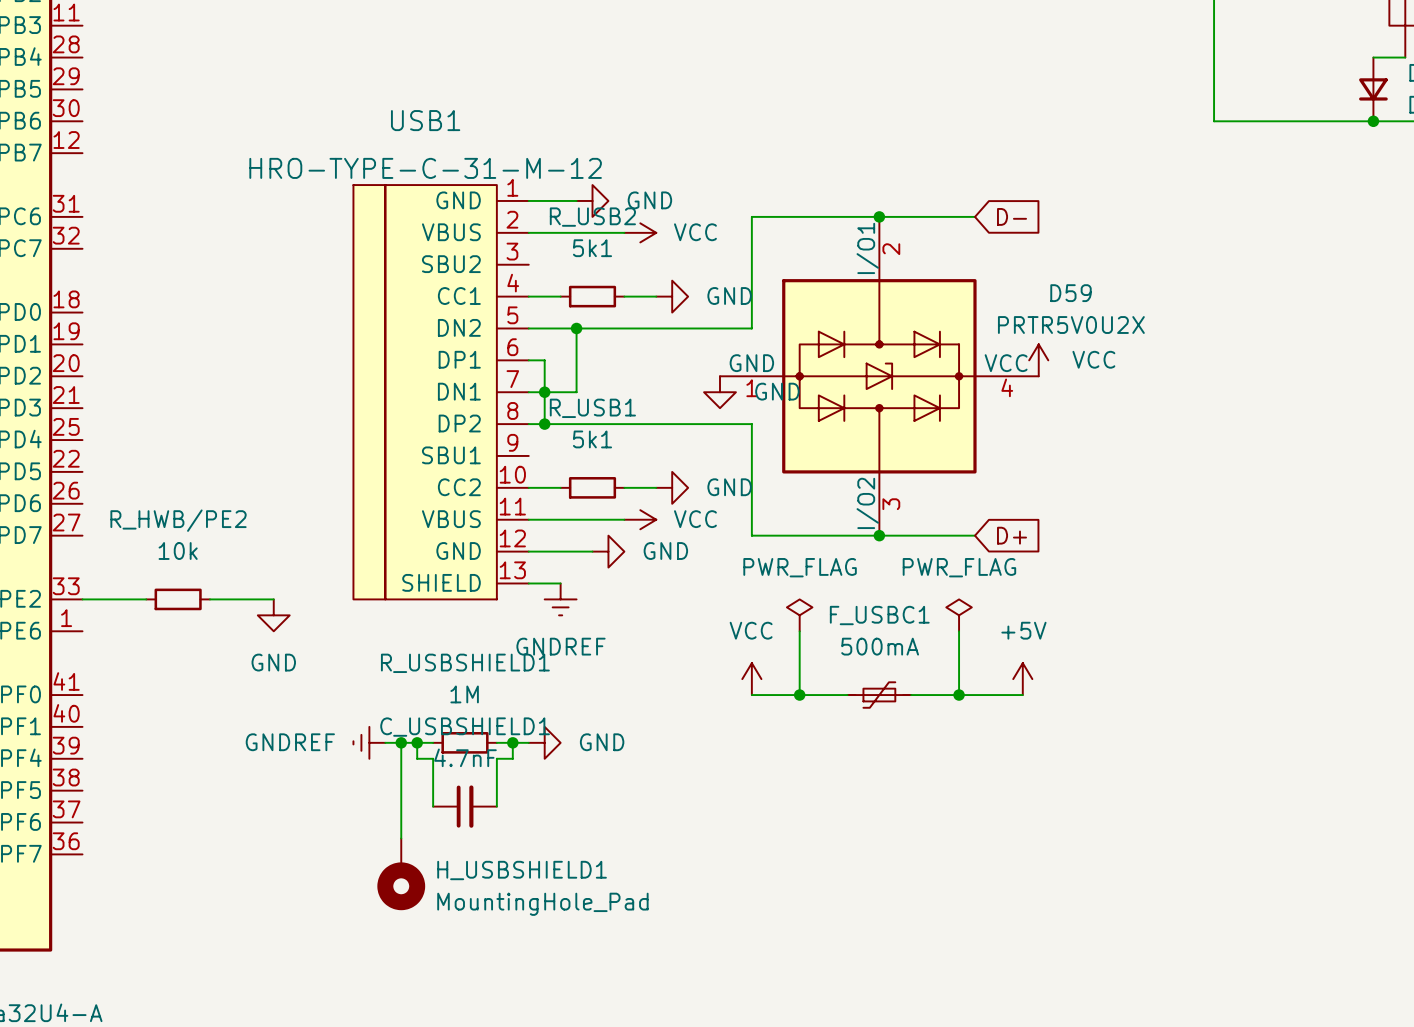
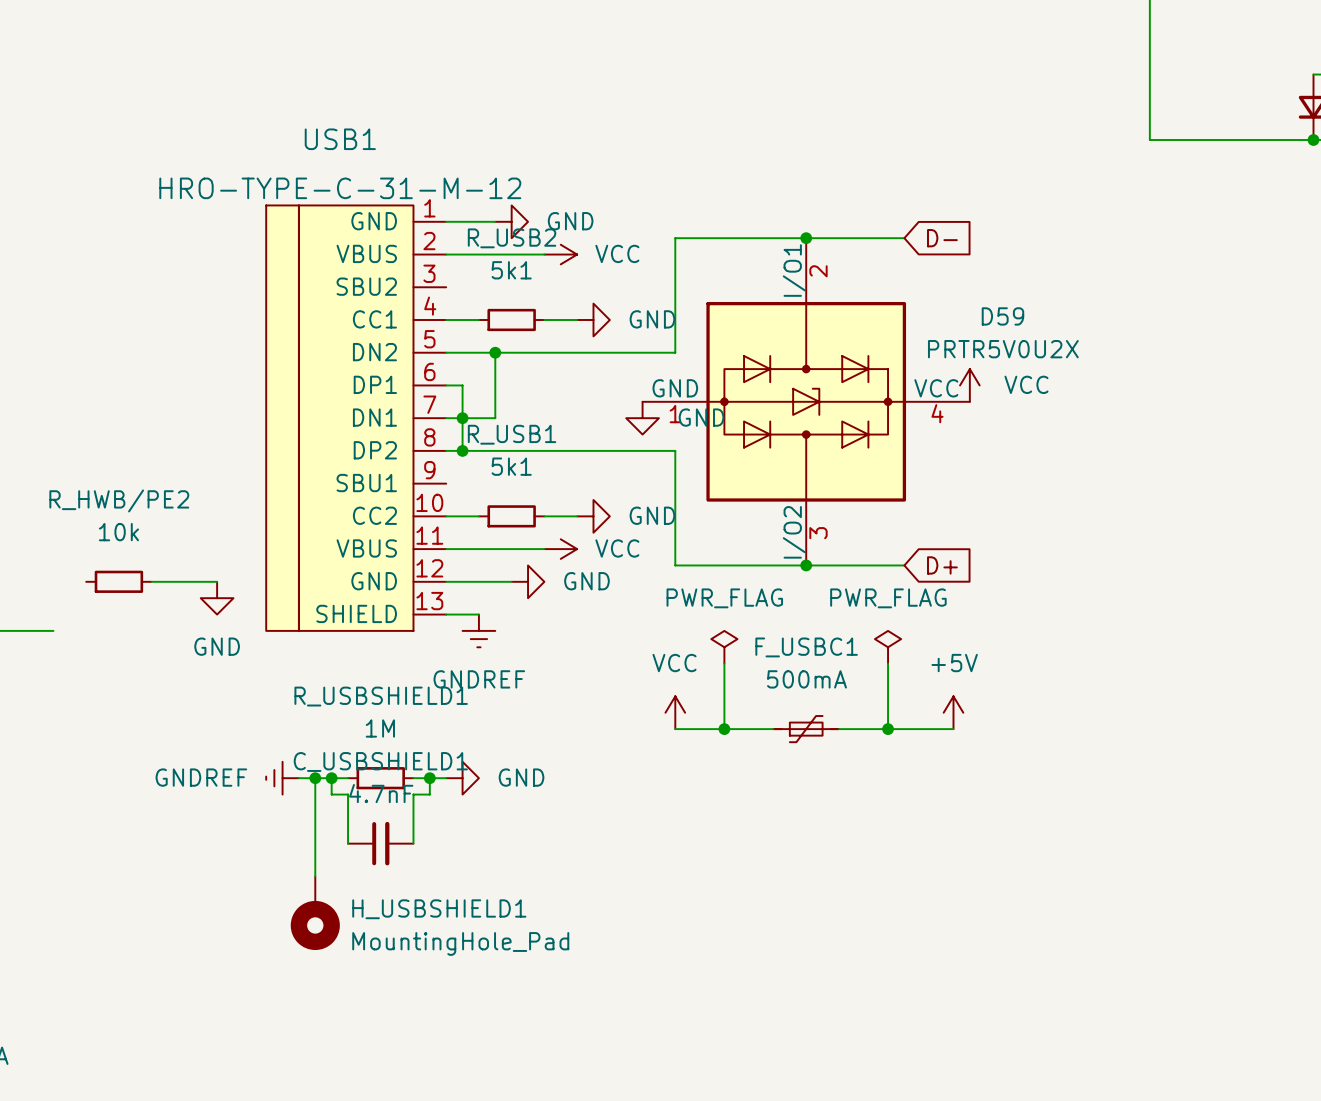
R_HWB/PE2 position: (178, 599) -> (118, 581)
wire: (210, 599) (273, 599) -> (151, 581) (217, 581)
power symbol position: GND (273, 615) -> GND (217, 598)

